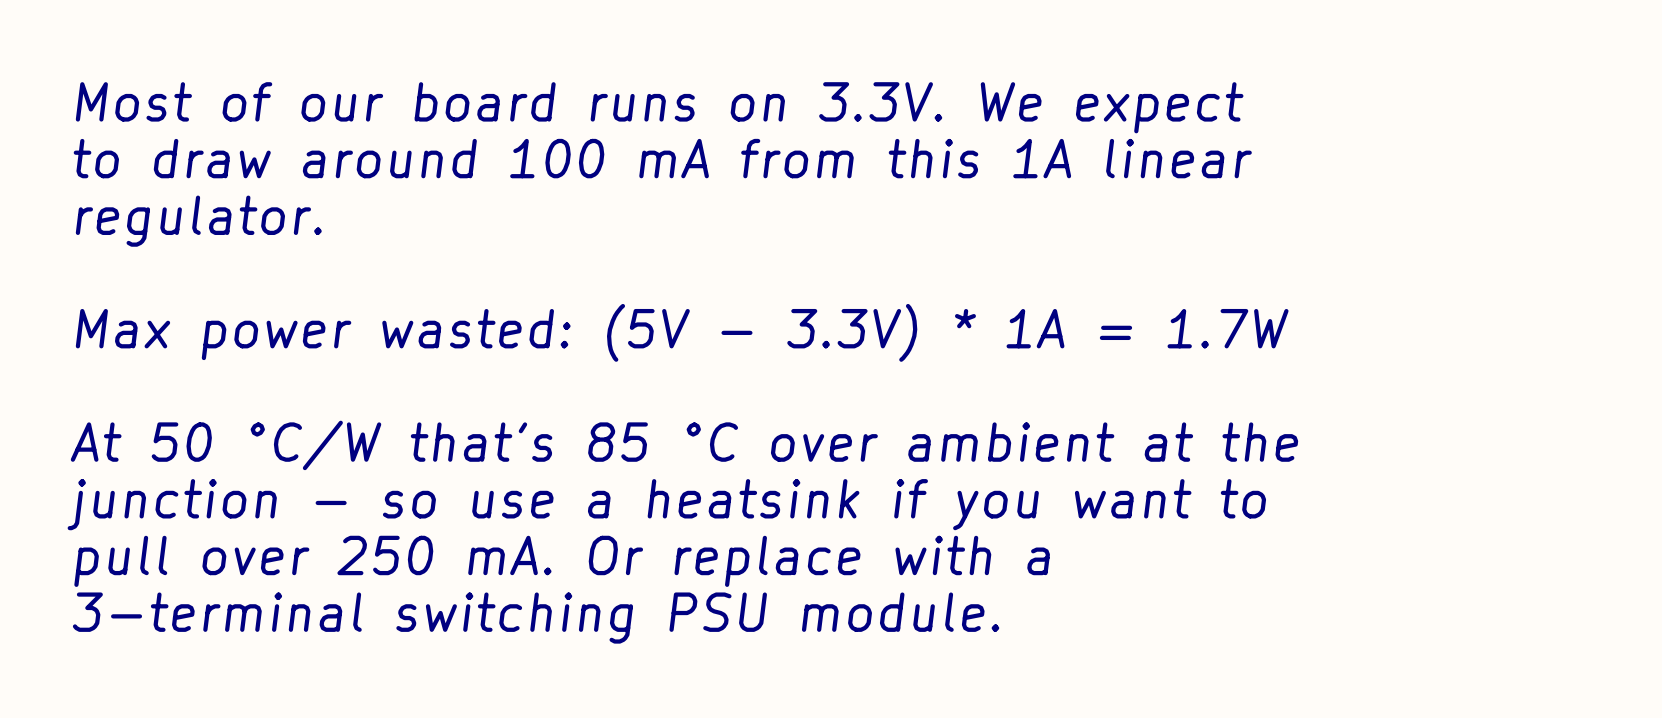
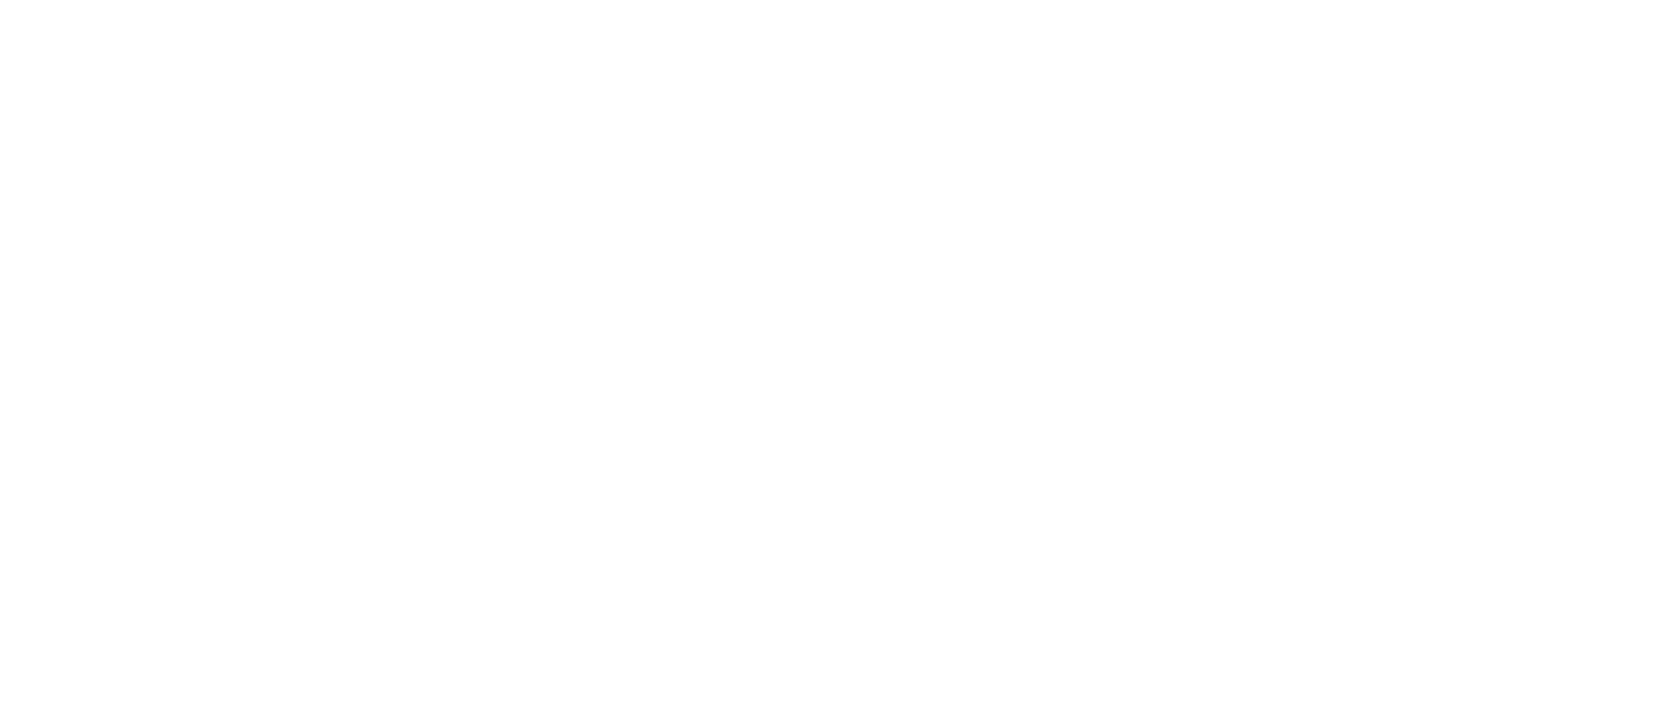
text: Most of our board runs on 3.3V. We expect (659, 107) -> none
text: to draw around 100 mA from this 1A linear (662, 158) -> none
text: regulator. (198, 221) -> none
text: Max power wasted: (5V - 3.3V) * 1A = 1.7W (682, 332) -> none
text: At 50 °C/W that's 85 °C over ambient at the (684, 445) -> none
text: junction - so use a heatsink if you want to (666, 504) -> none
text: pull over 250 mA. Or replace with a (562, 561) -> none
text: 3-terminal switching PSU module. (536, 618) -> none

